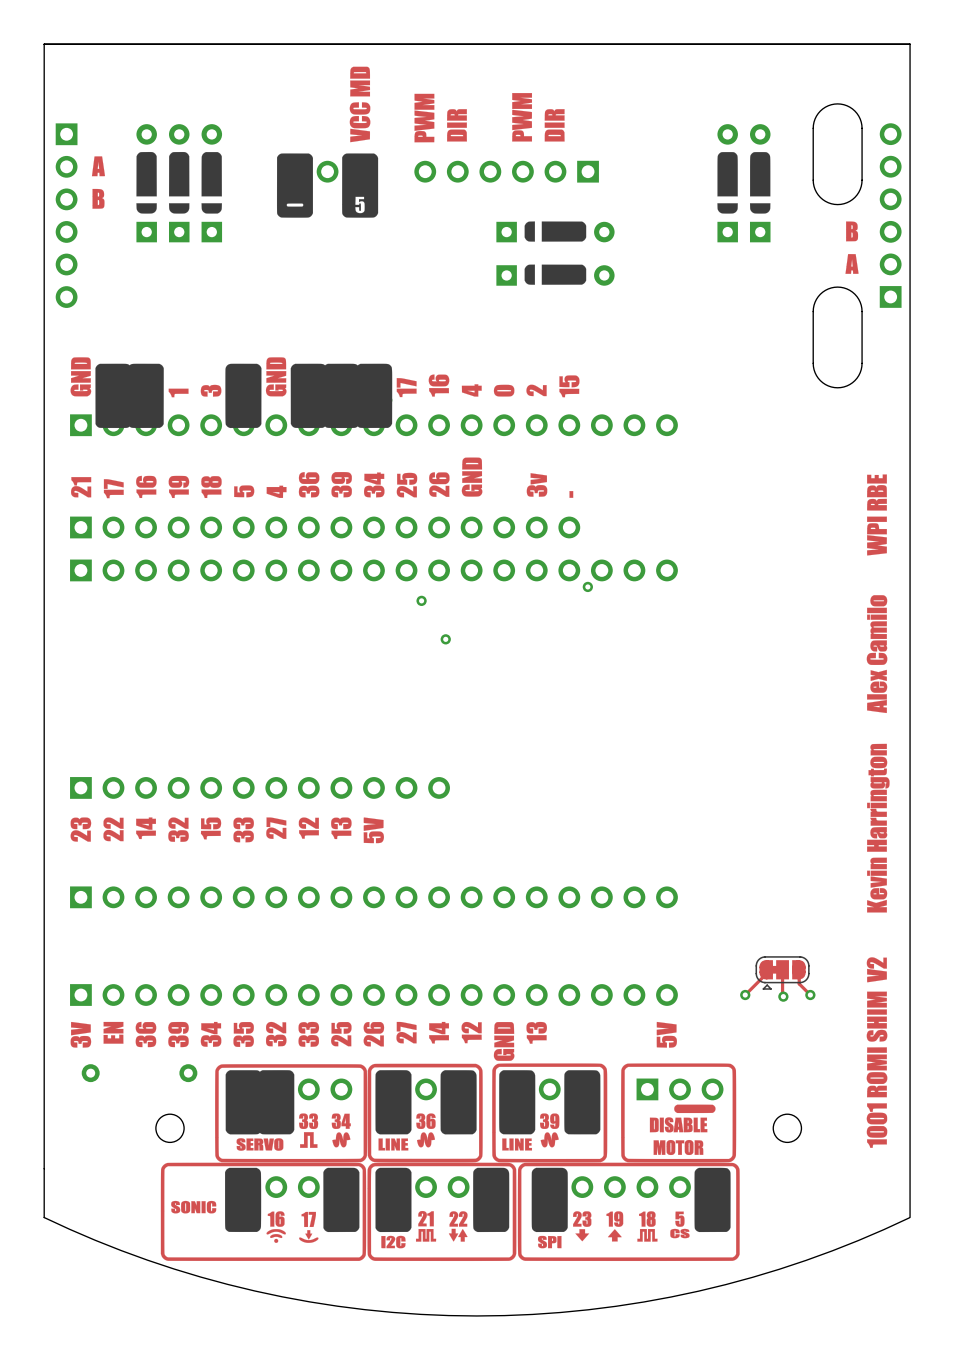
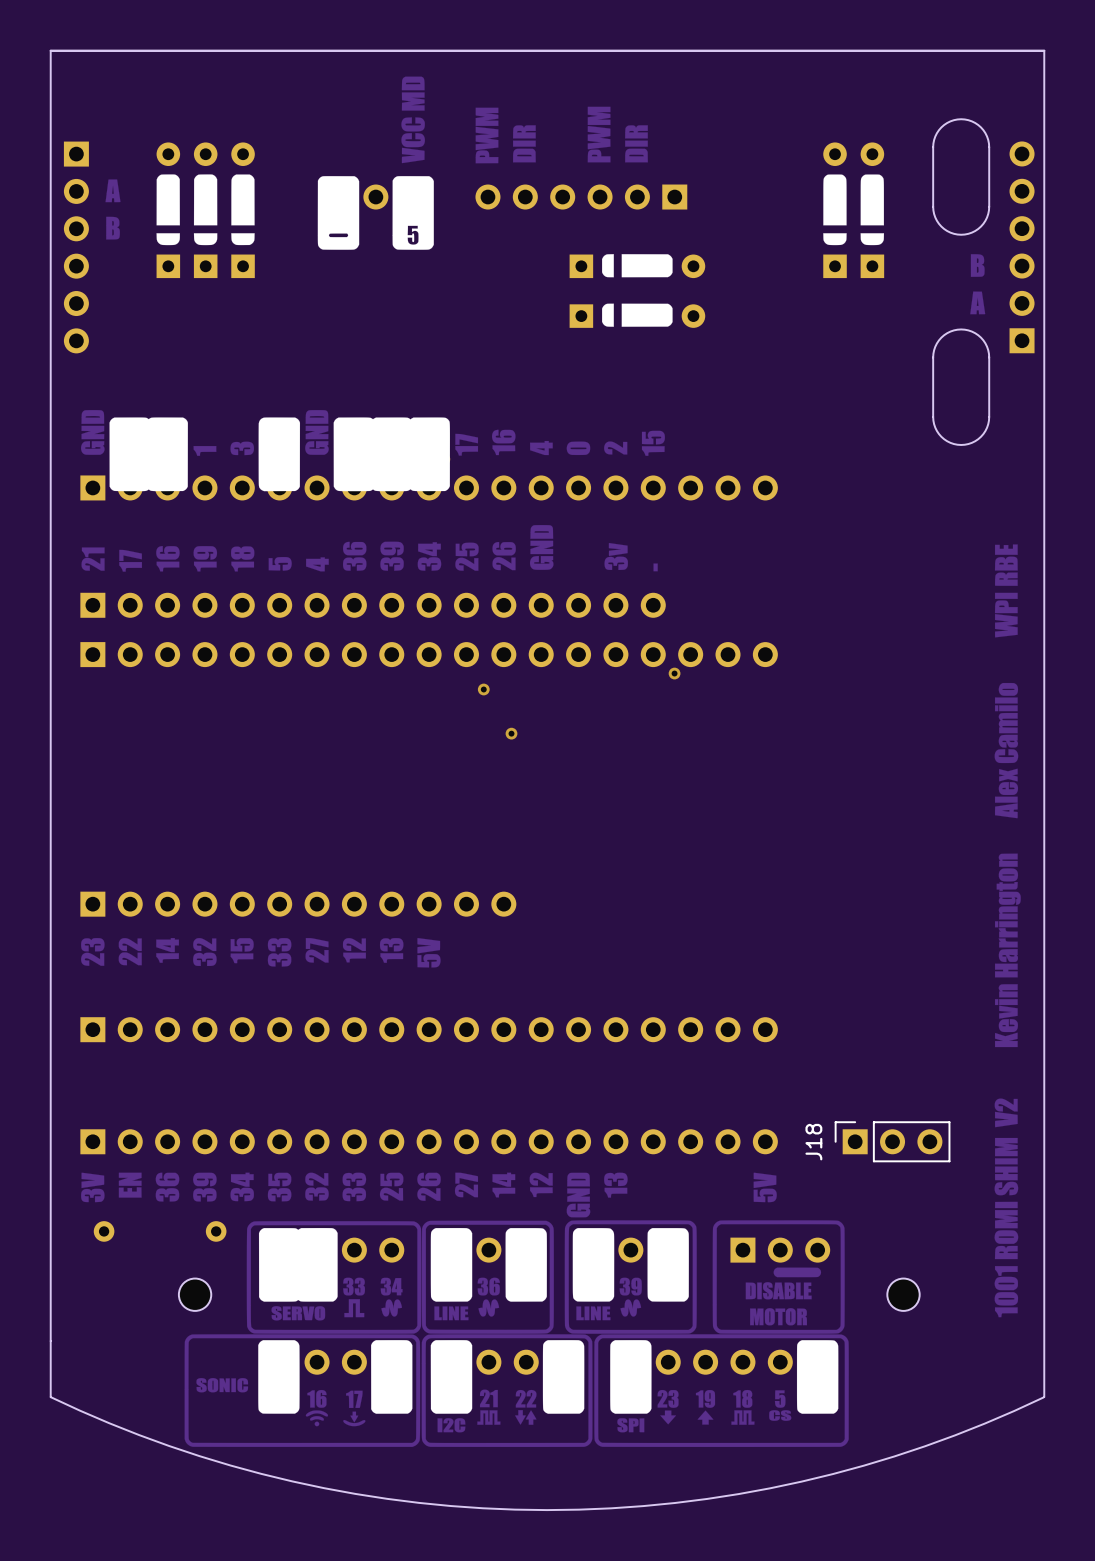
track: (765, 969) (765, 974) (745, 995) -> none
track: (782, 969) (783, 996) -> none
track: (799, 969) (799, 983) (810, 995) -> none
part: (782, 972) -> none
via: (745, 995) -> none
J18: none -> (892, 1141)
via: (810, 995) -> none
via: (783, 996) -> none

